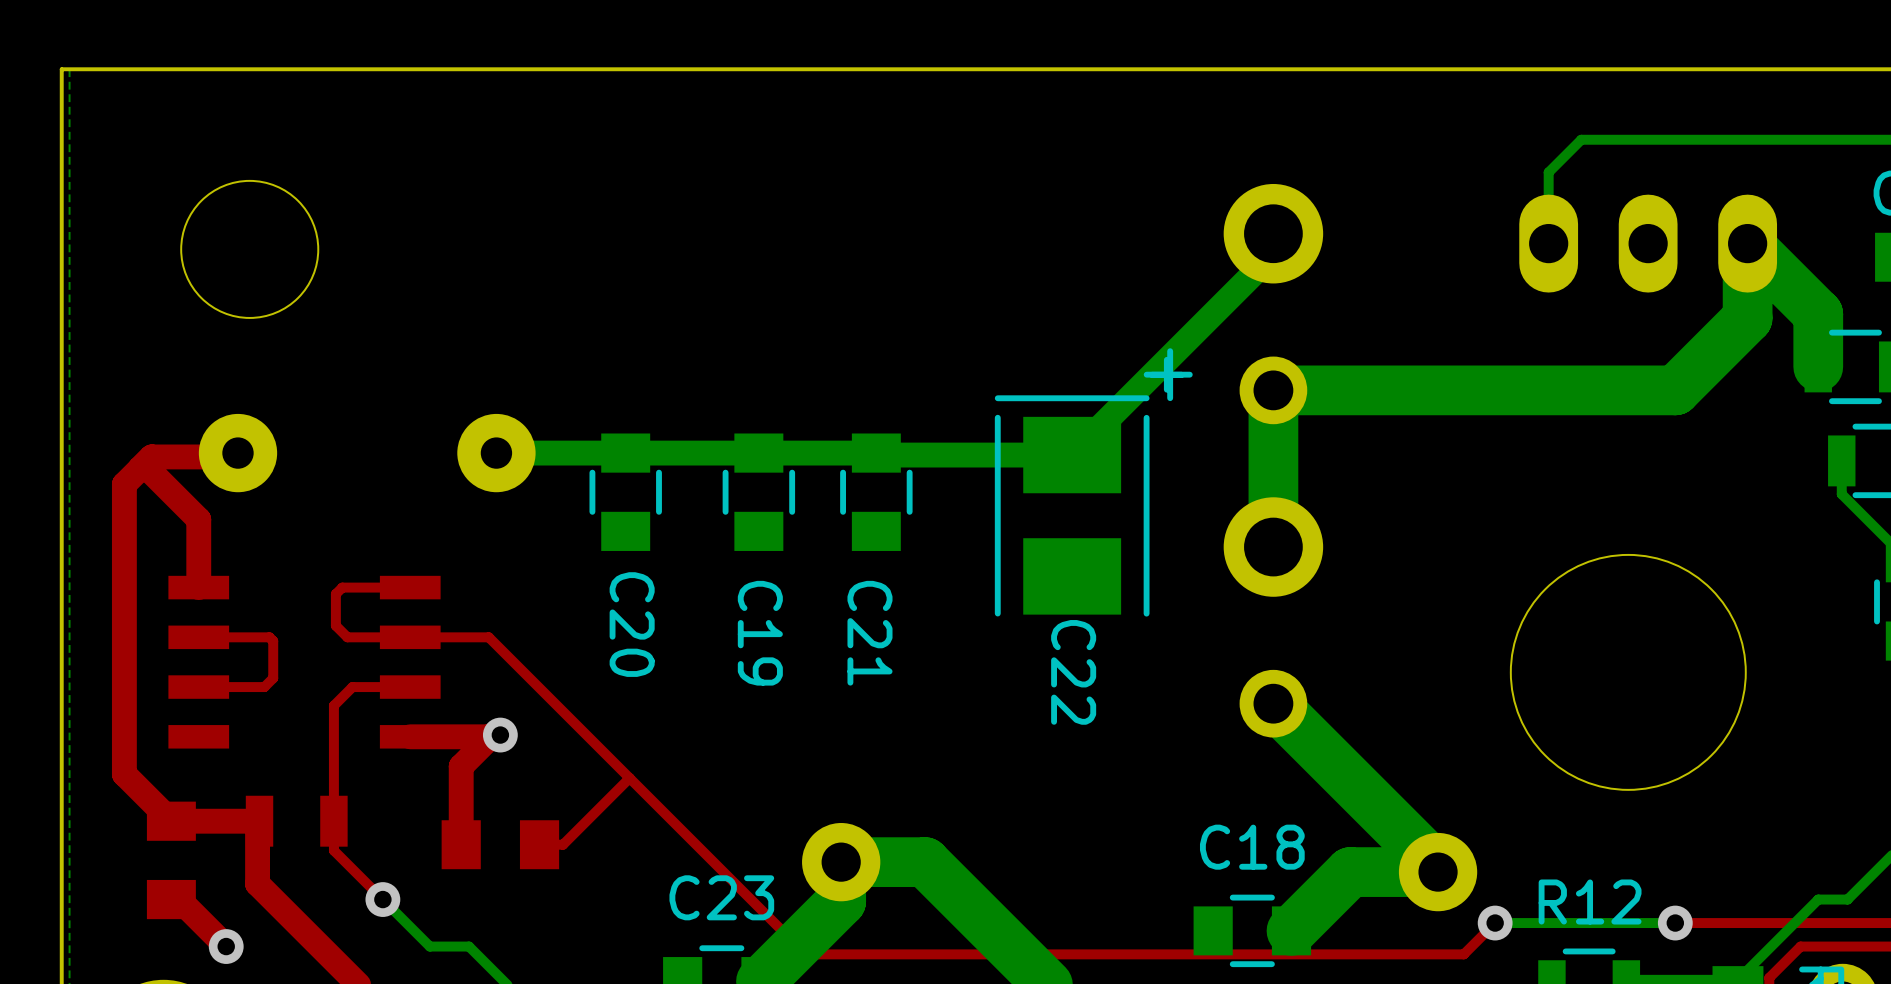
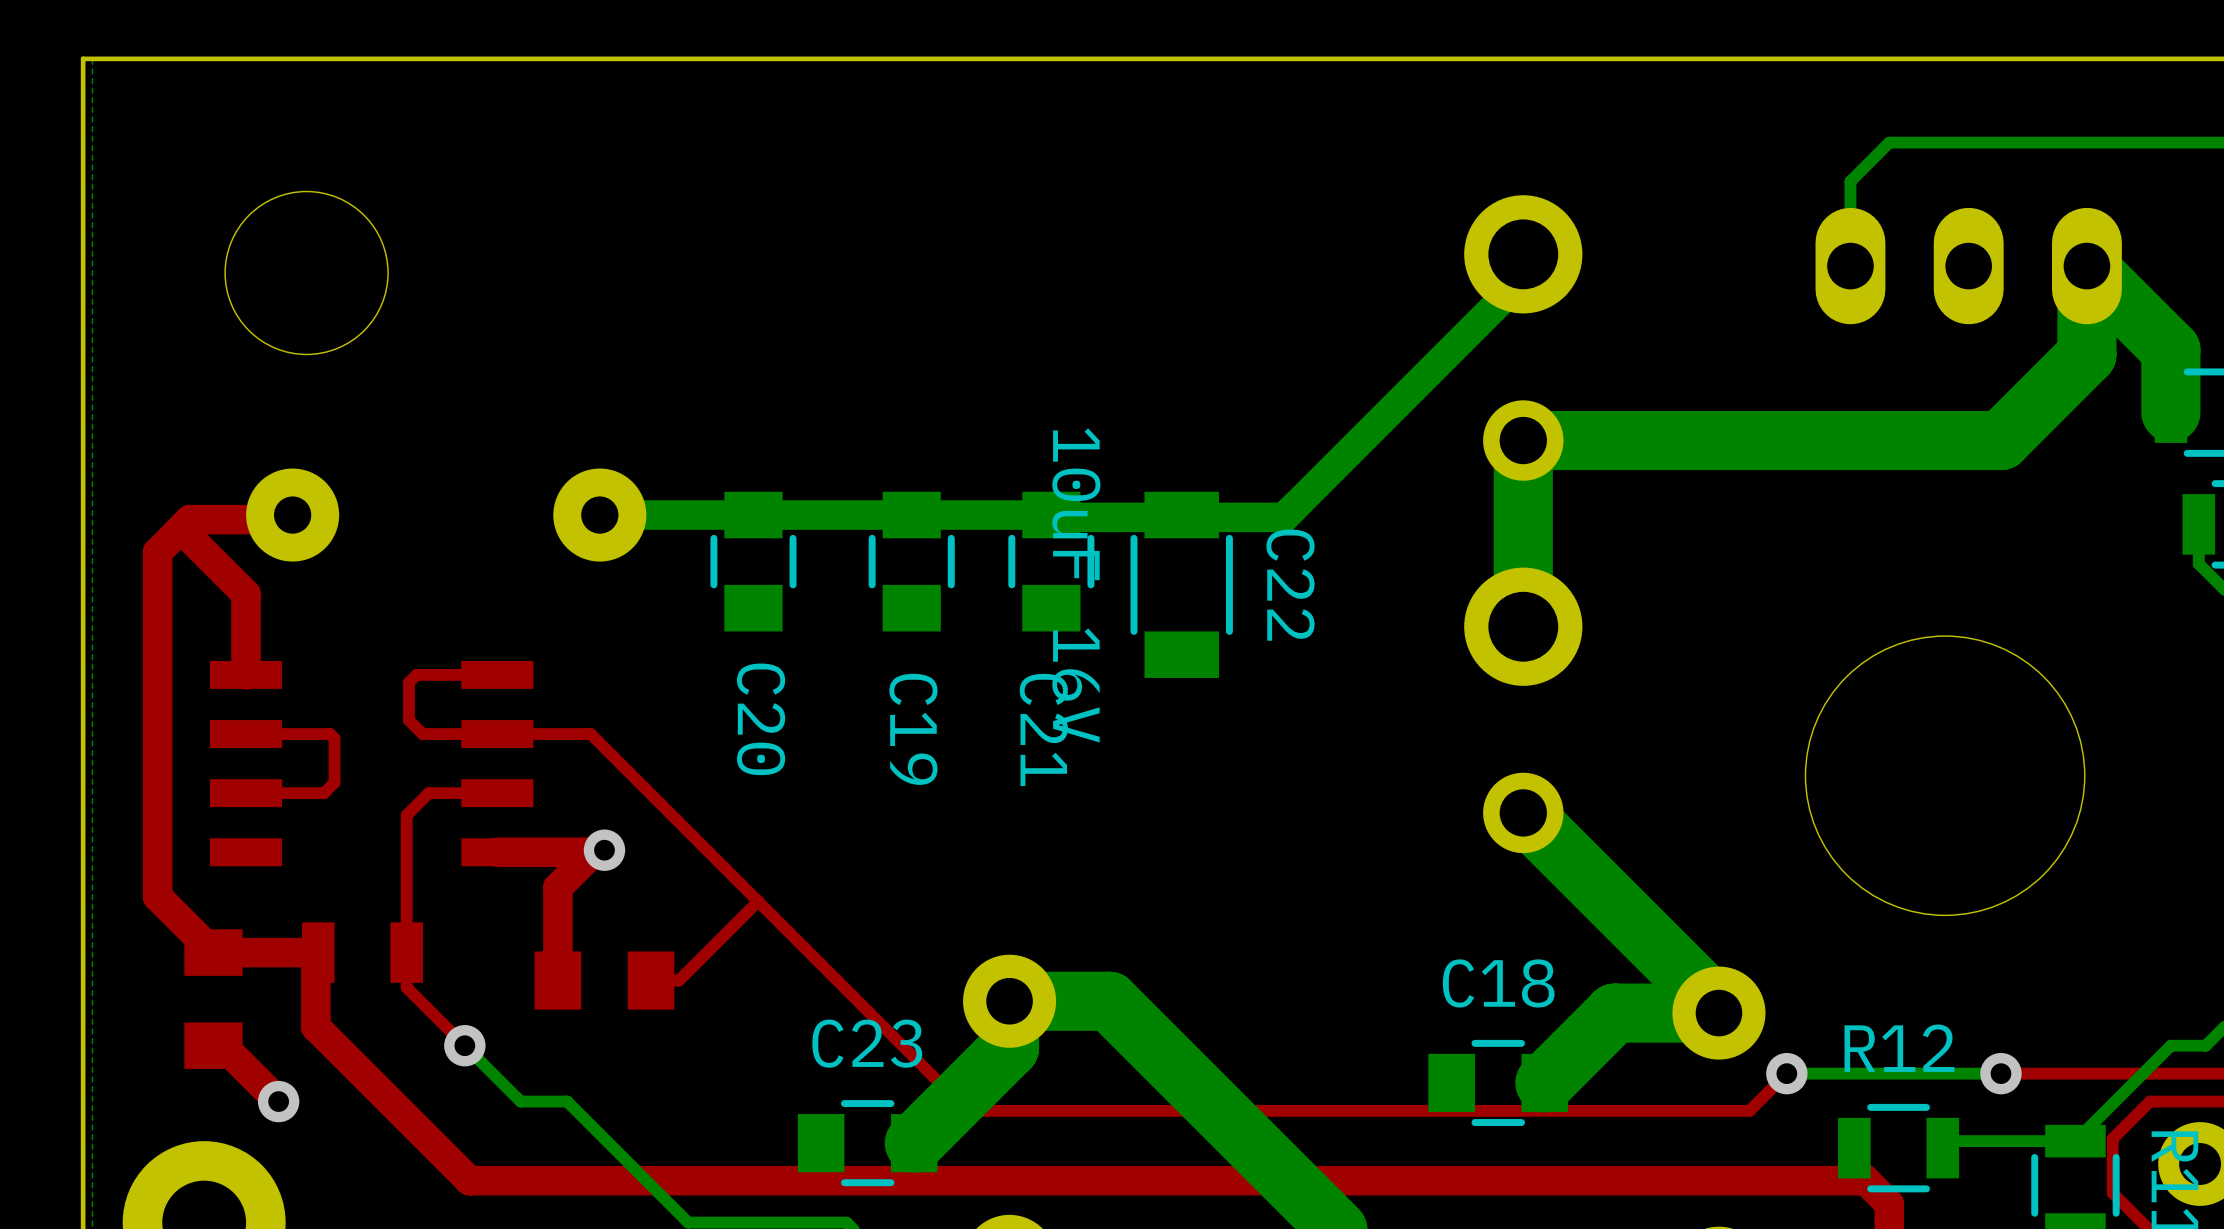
C22 footprint: [994, 348, 1193, 617] -> [1130, 491, 1233, 678]
C22 value: none -> 10uF 16V (1076, 585)
C22 name position: C22 (1073, 672) -> C22 (1290, 585)

